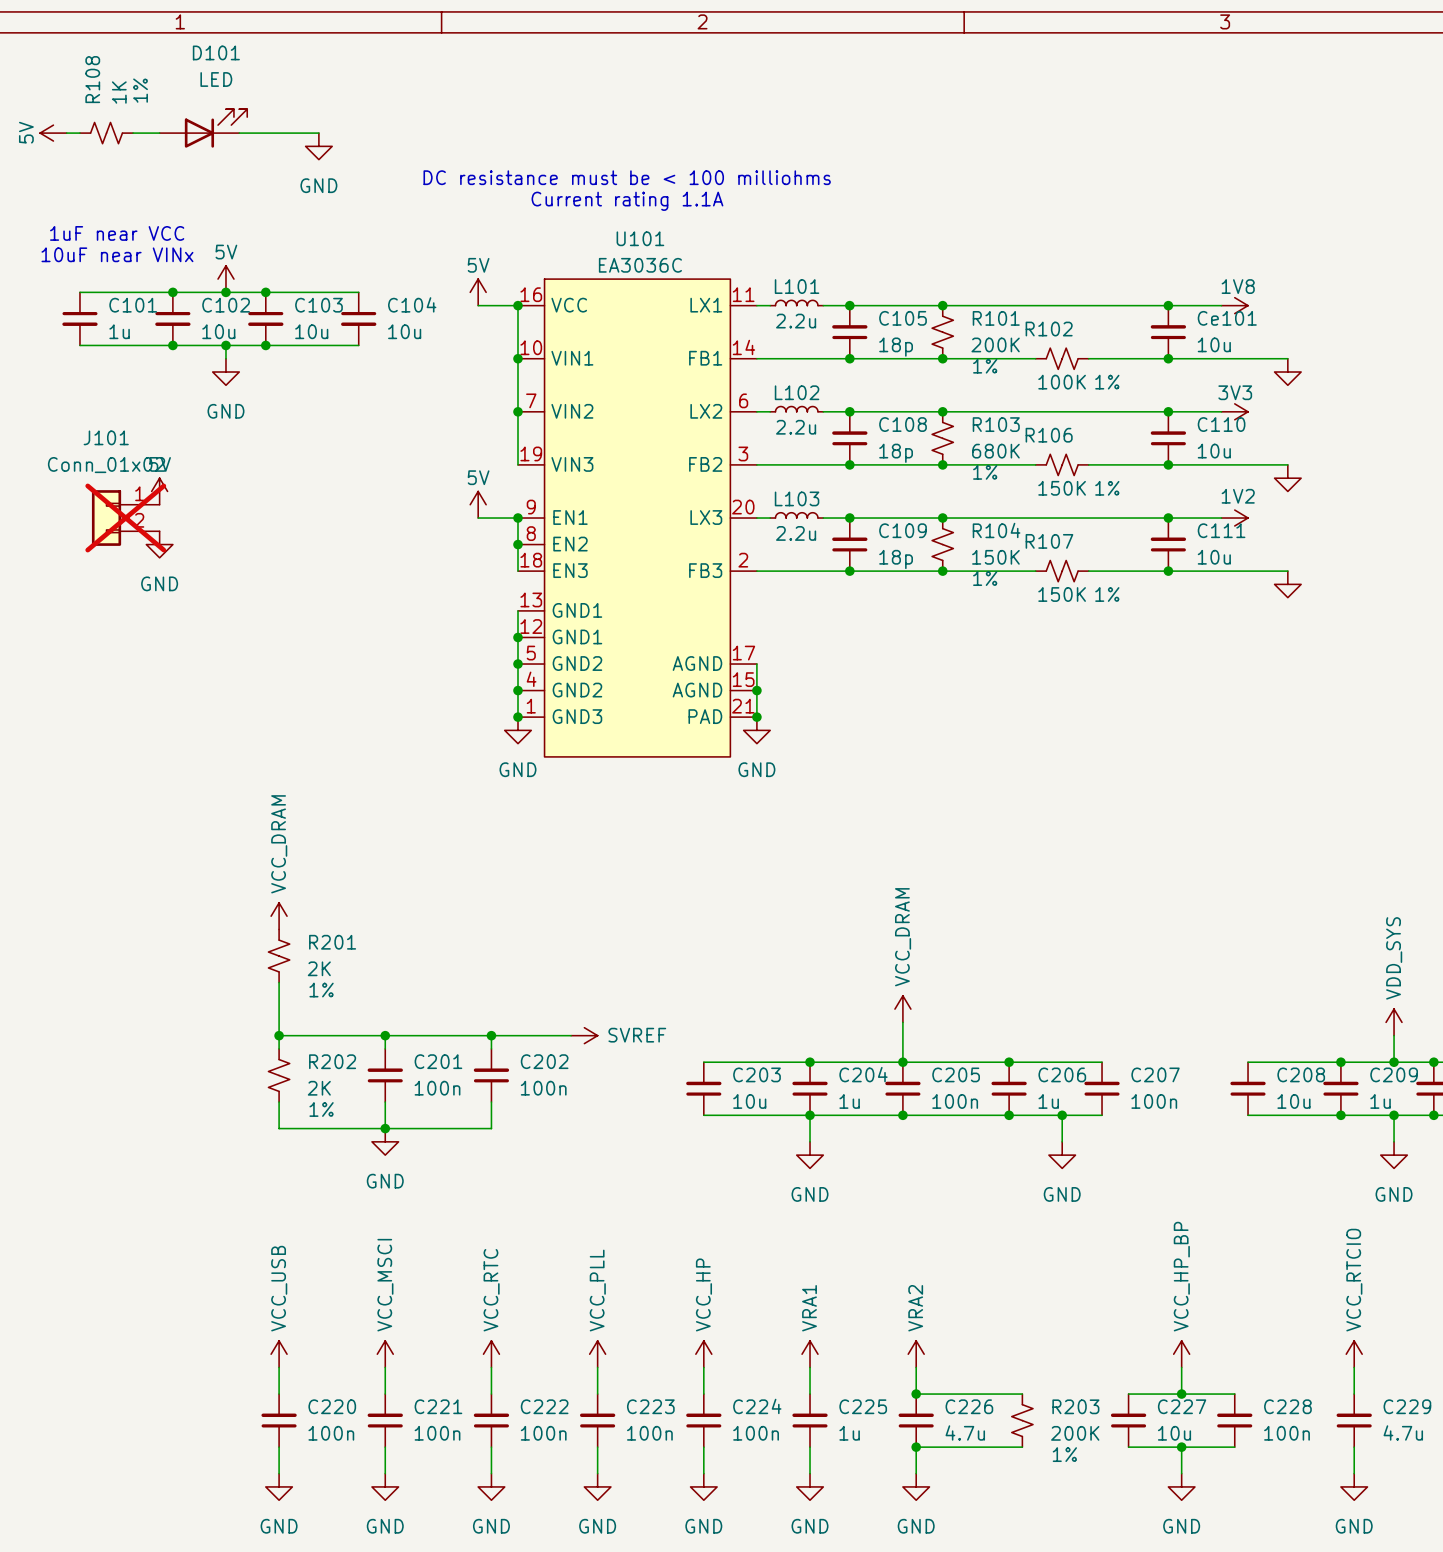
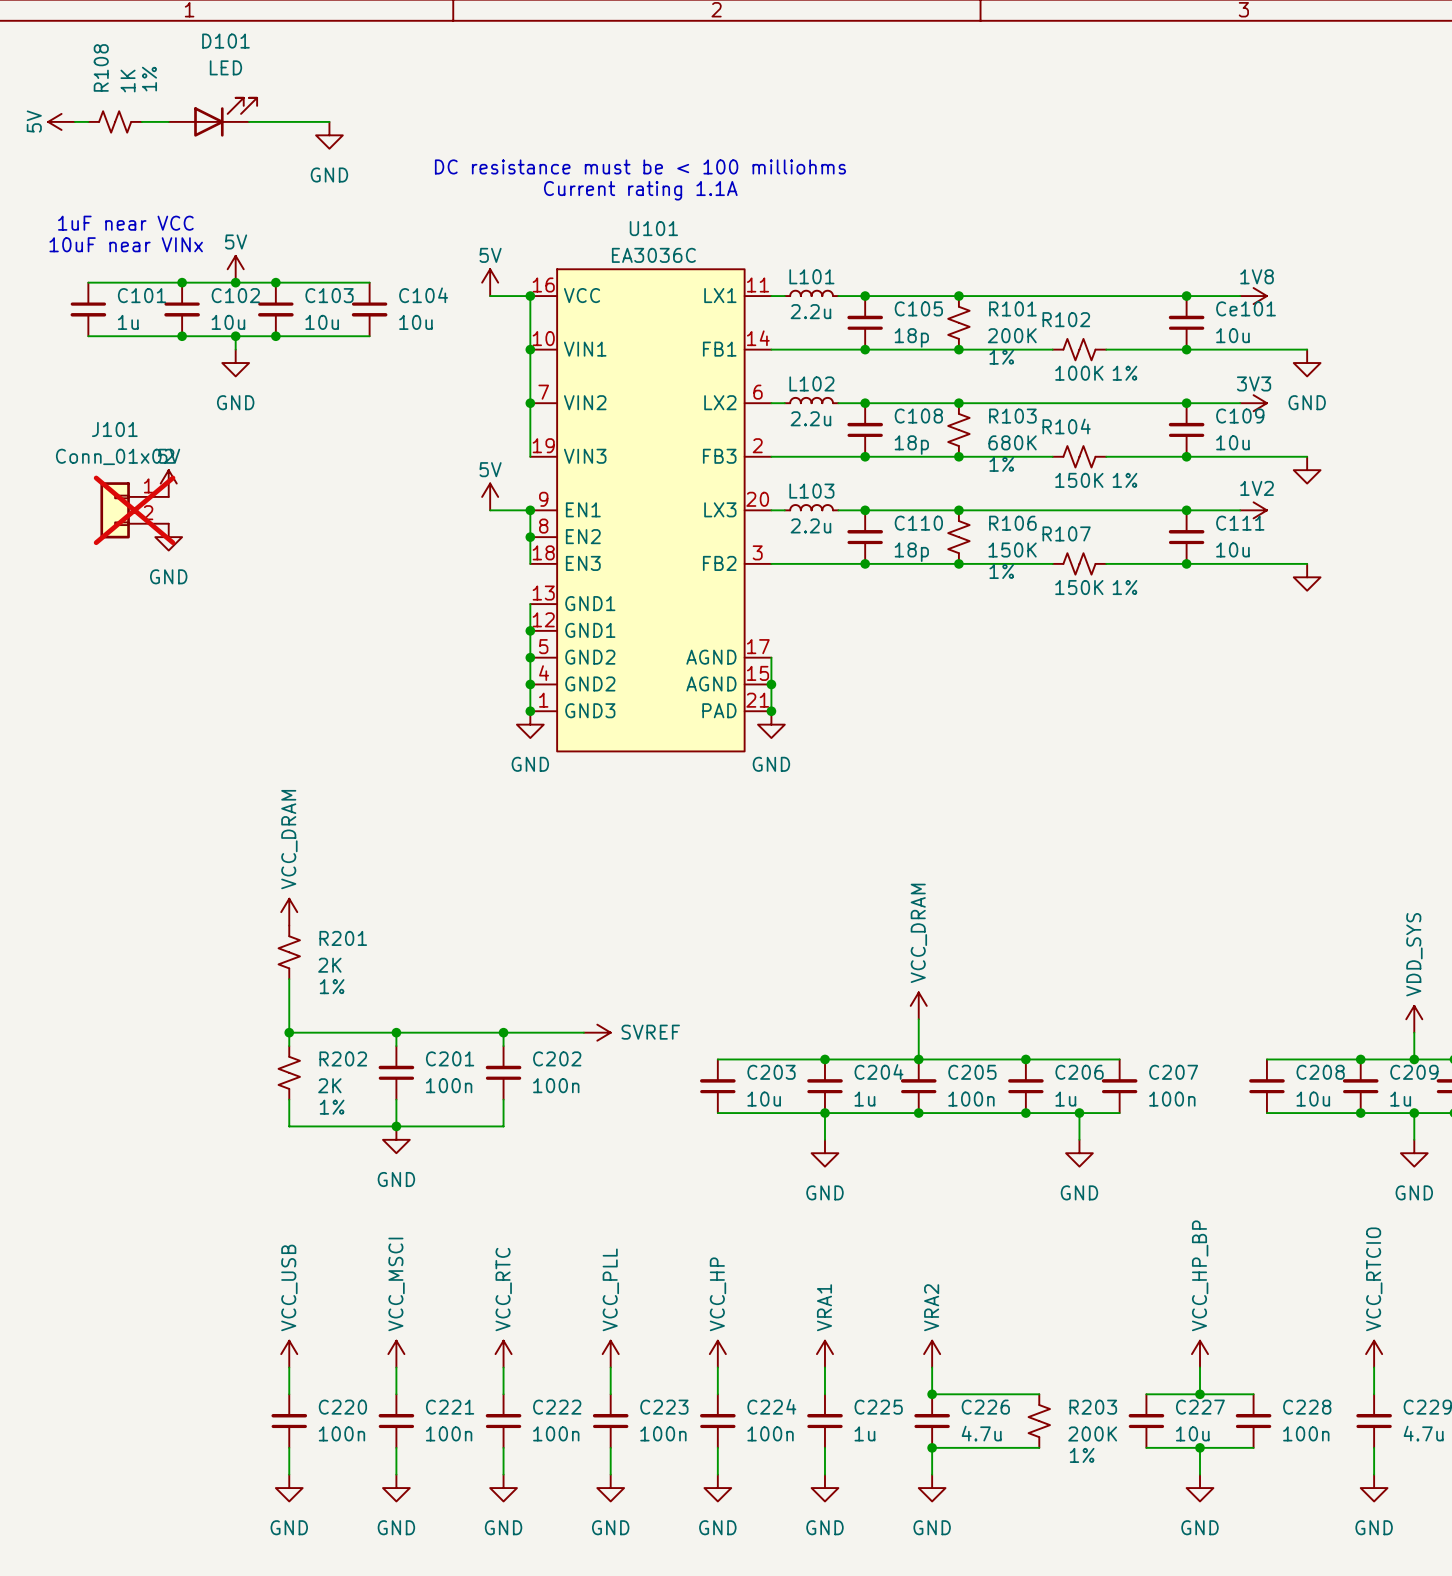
power symbol text: none -> GND (1307, 402)
C110 name: C110 (1221, 424) -> C109 (1240, 416)
R106 name: R106 (1049, 435) -> R104 (1066, 426)
U101 pin number: 3 (743, 453) -> 2 (757, 445)
U101 pin name: FB2 (705, 464) -> FB3 (719, 456)
C109 name: C109 (903, 530) -> C110 (918, 523)
R104 name: R104 (996, 530) -> R106 (1012, 523)
U101 pin number: 2 (743, 560) -> 3 (757, 552)
U101 pin name: FB3 (705, 570) -> FB2 (719, 563)

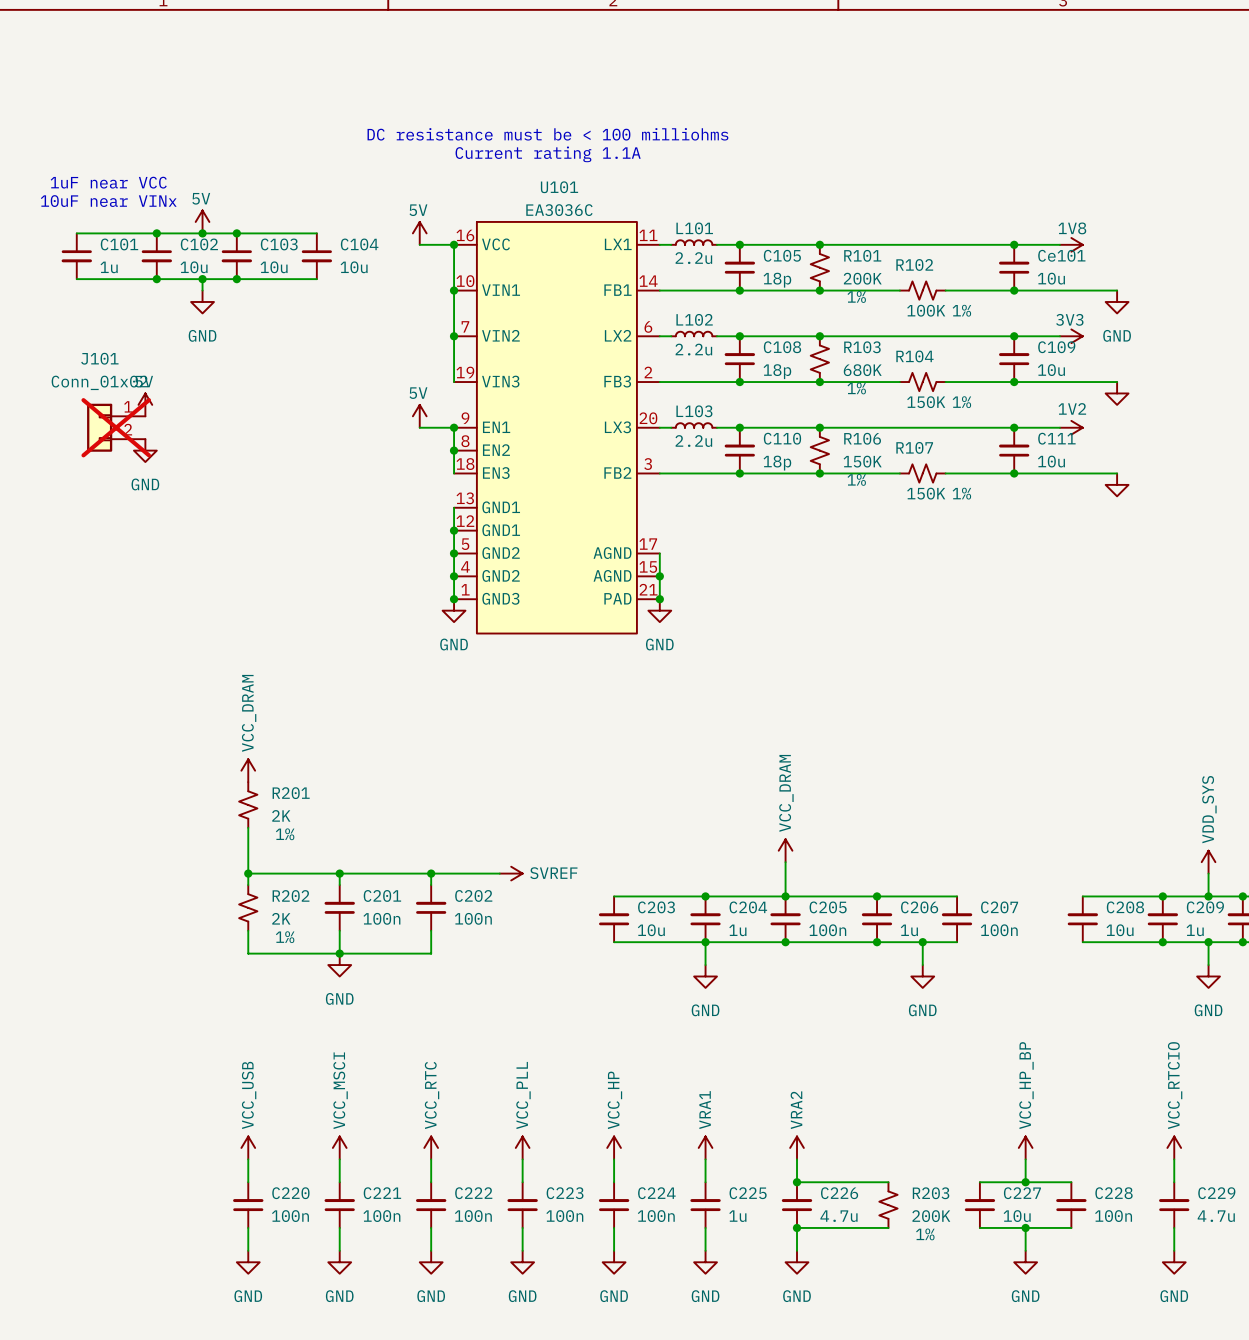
D101: LED (212, 117) -> none
power symbol: 5V (61, 121) -> none
wire: (74, 121) (88, 121) -> none
R108: 1K (115, 121) -> none
wire: (141, 121) (168, 121) -> none
wire: (249, 121) (329, 121) -> none
power symbol: GND (329, 135) -> none

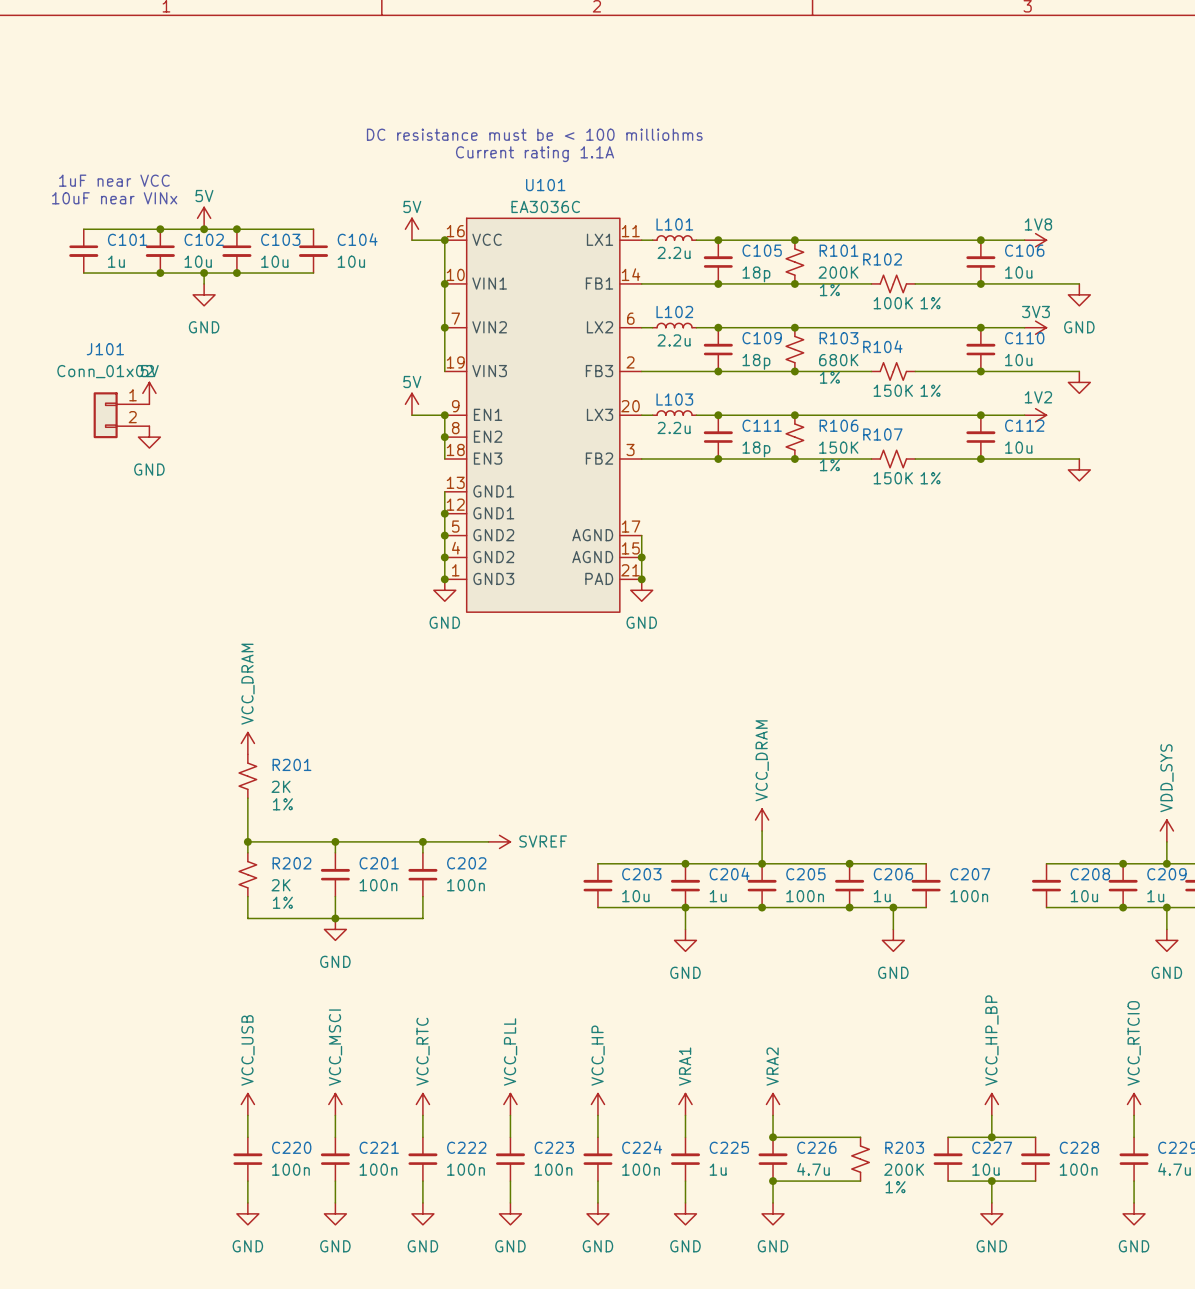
Ce101 name: Ce101 (1061, 255) -> C106 (1024, 250)
C108 name: C108 (782, 347) -> C109 (762, 338)
C109 name: C109 (1056, 347) -> C110 (1024, 338)
J101 do-not-place cross: (116, 427) -> none
C110 name: C110 (782, 438) -> C111 (762, 425)
C111 name: C111 (1056, 438) -> C112 (1024, 425)

